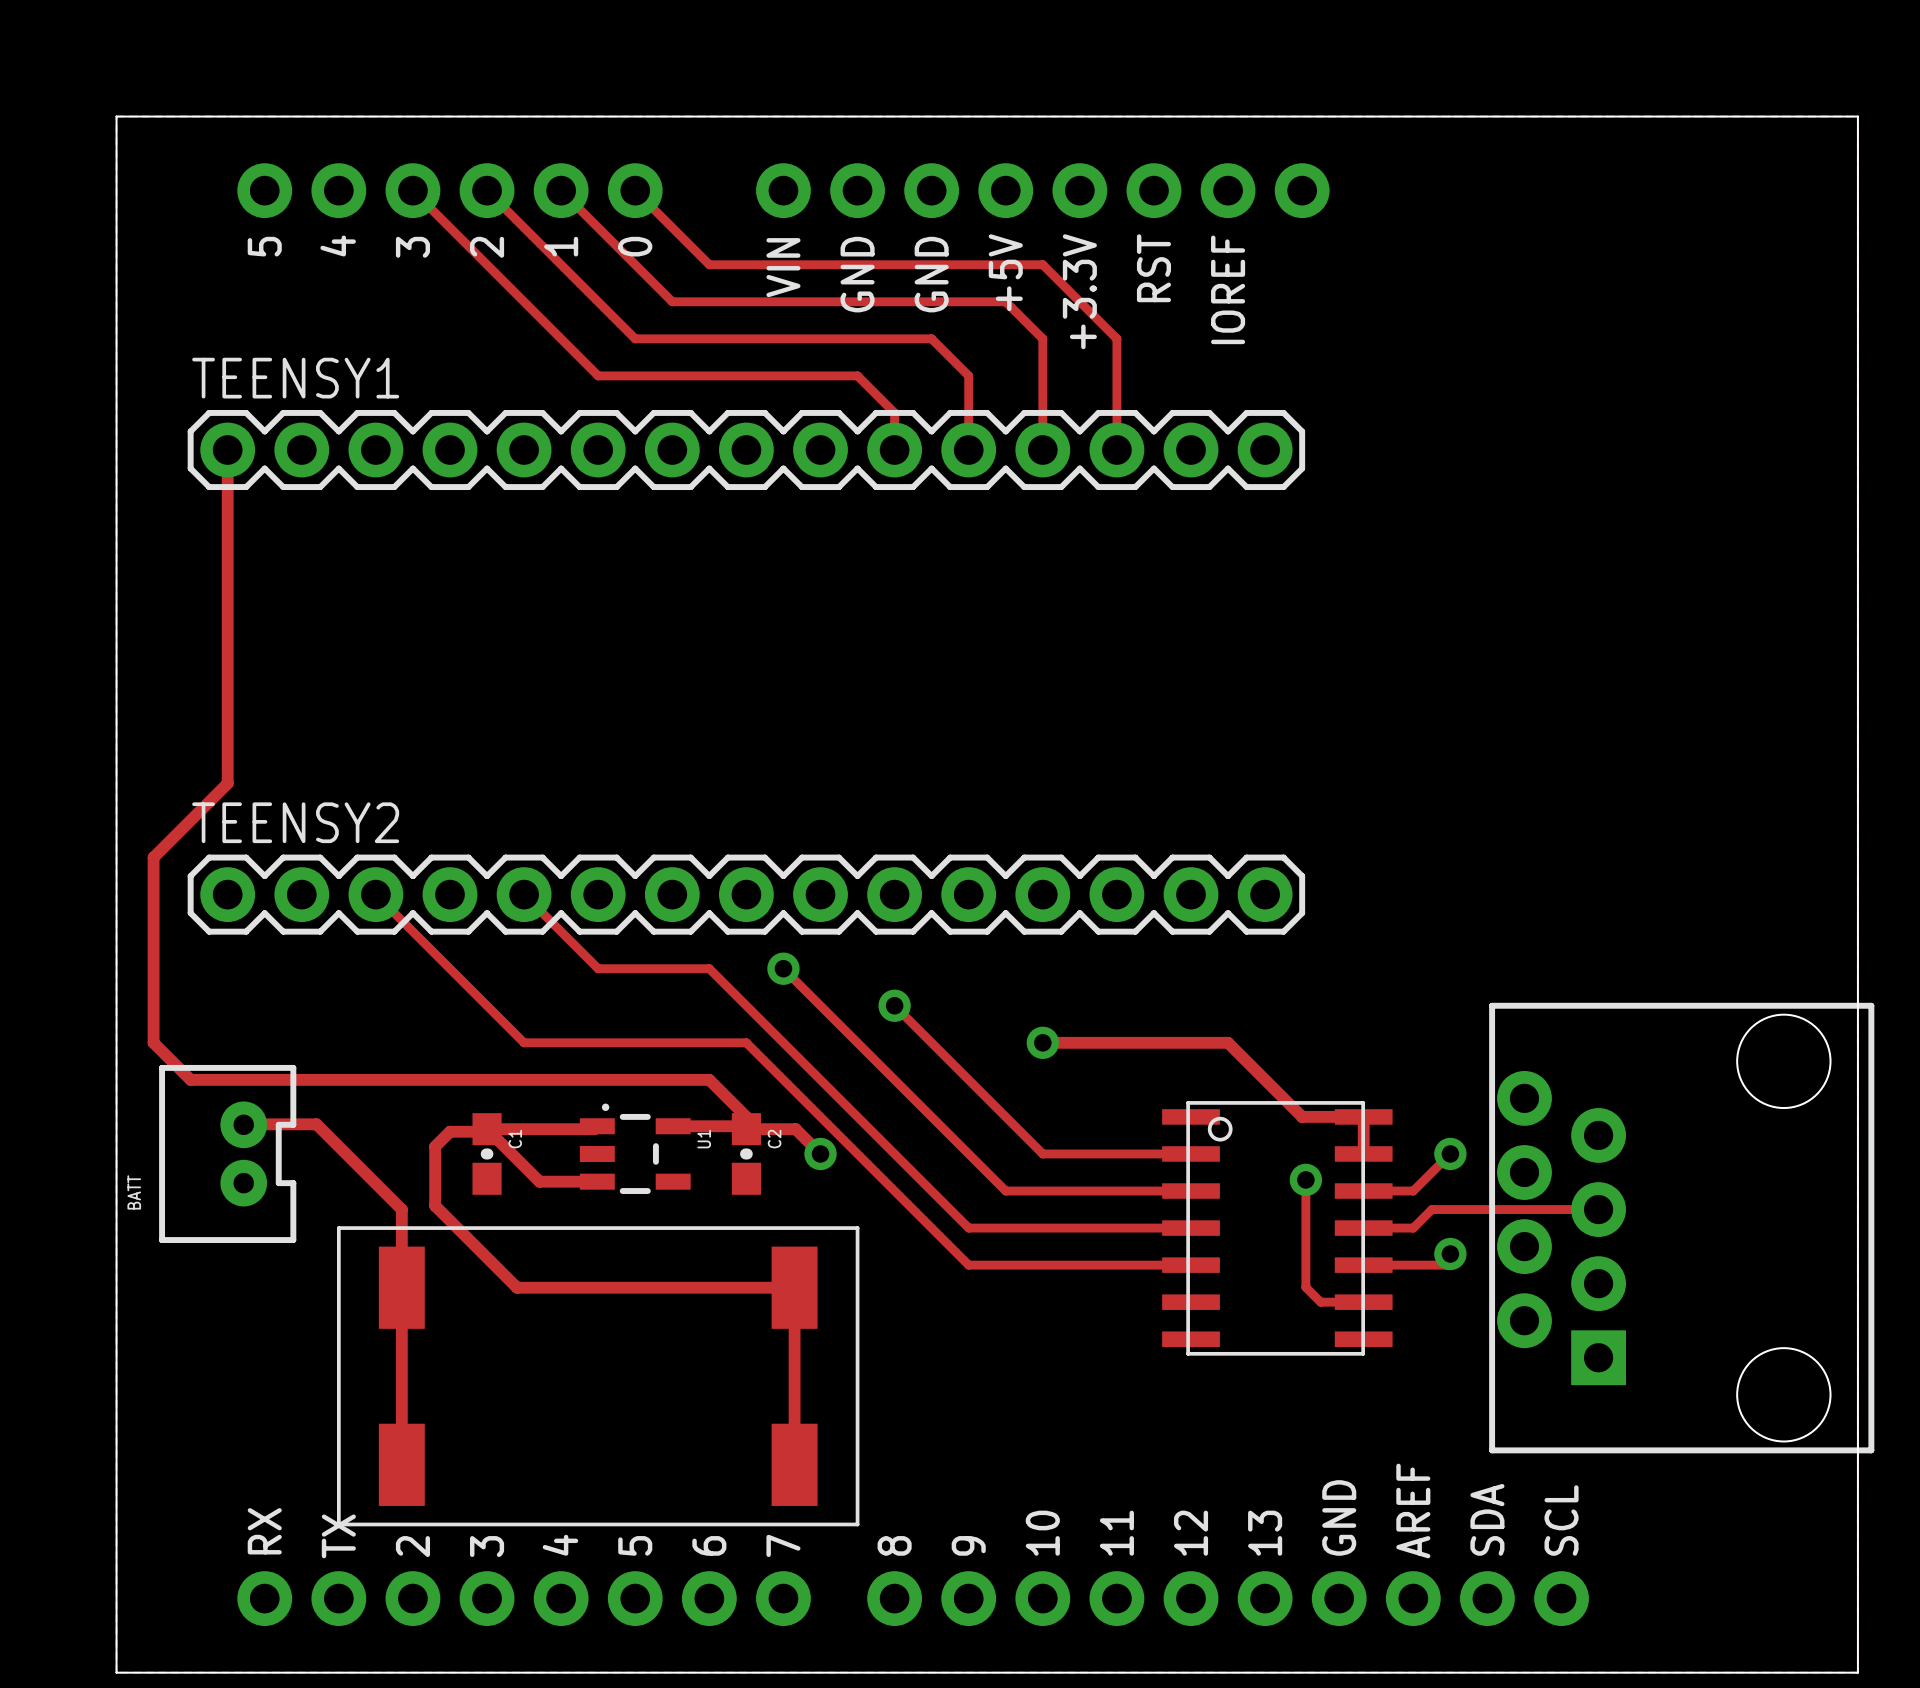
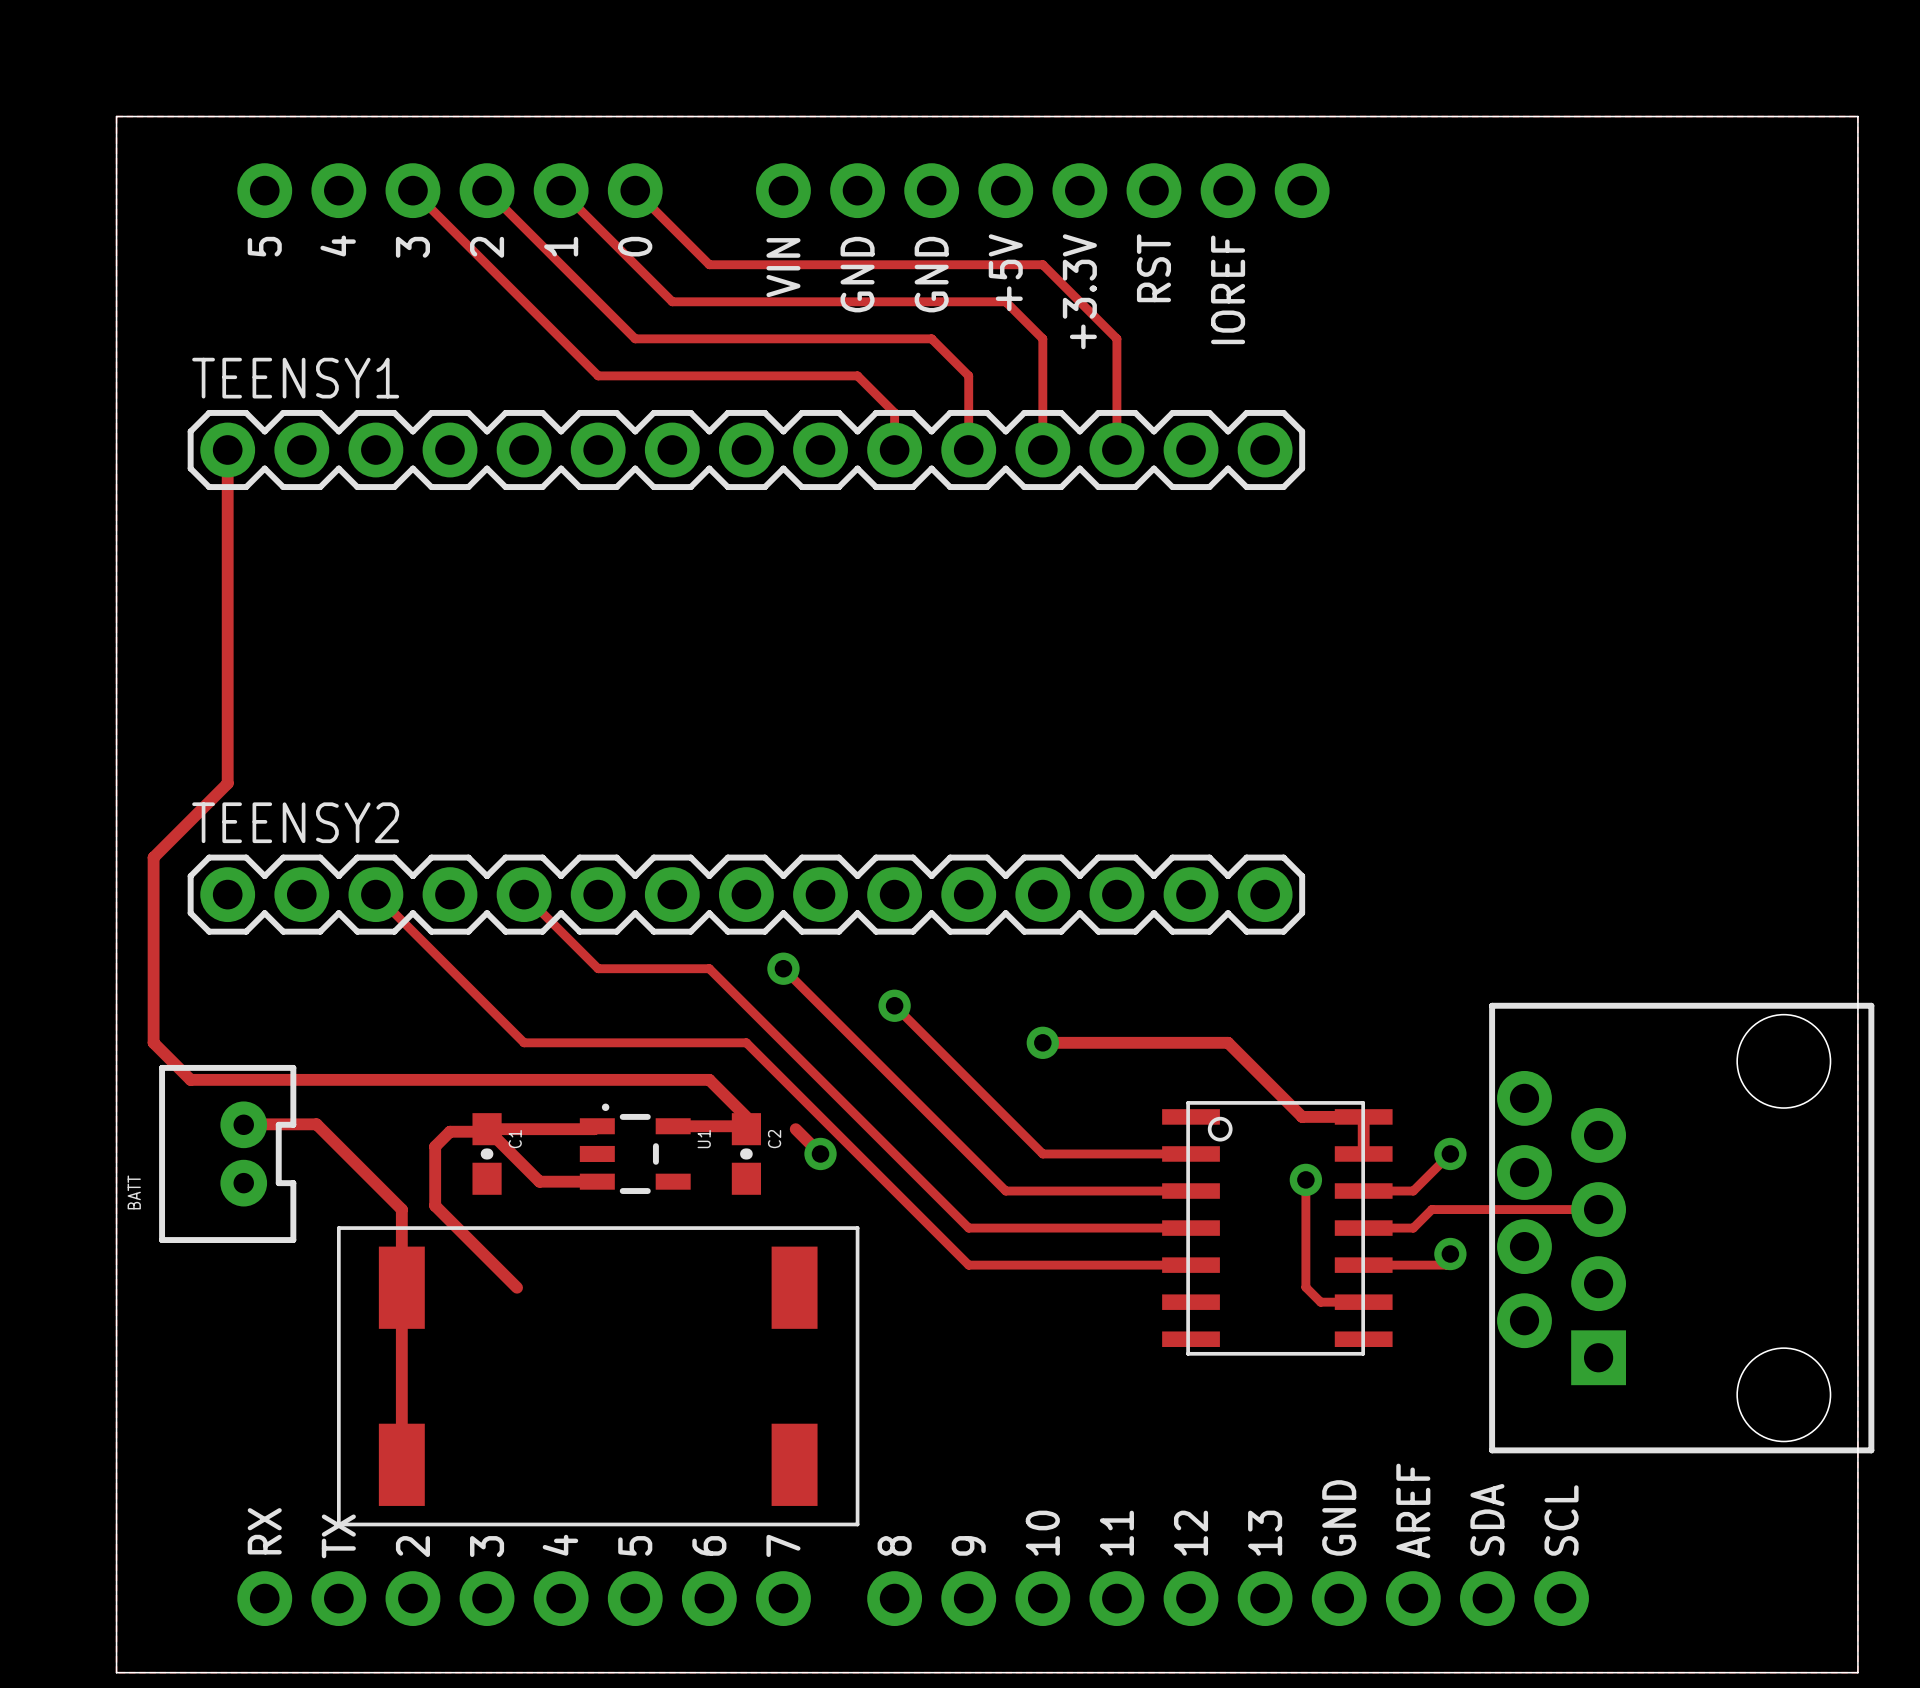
track: (746, 1116) (746, 1129) (795, 1129) -> none
track: (517, 1287) (794, 1287) (794, 1464) -> none

